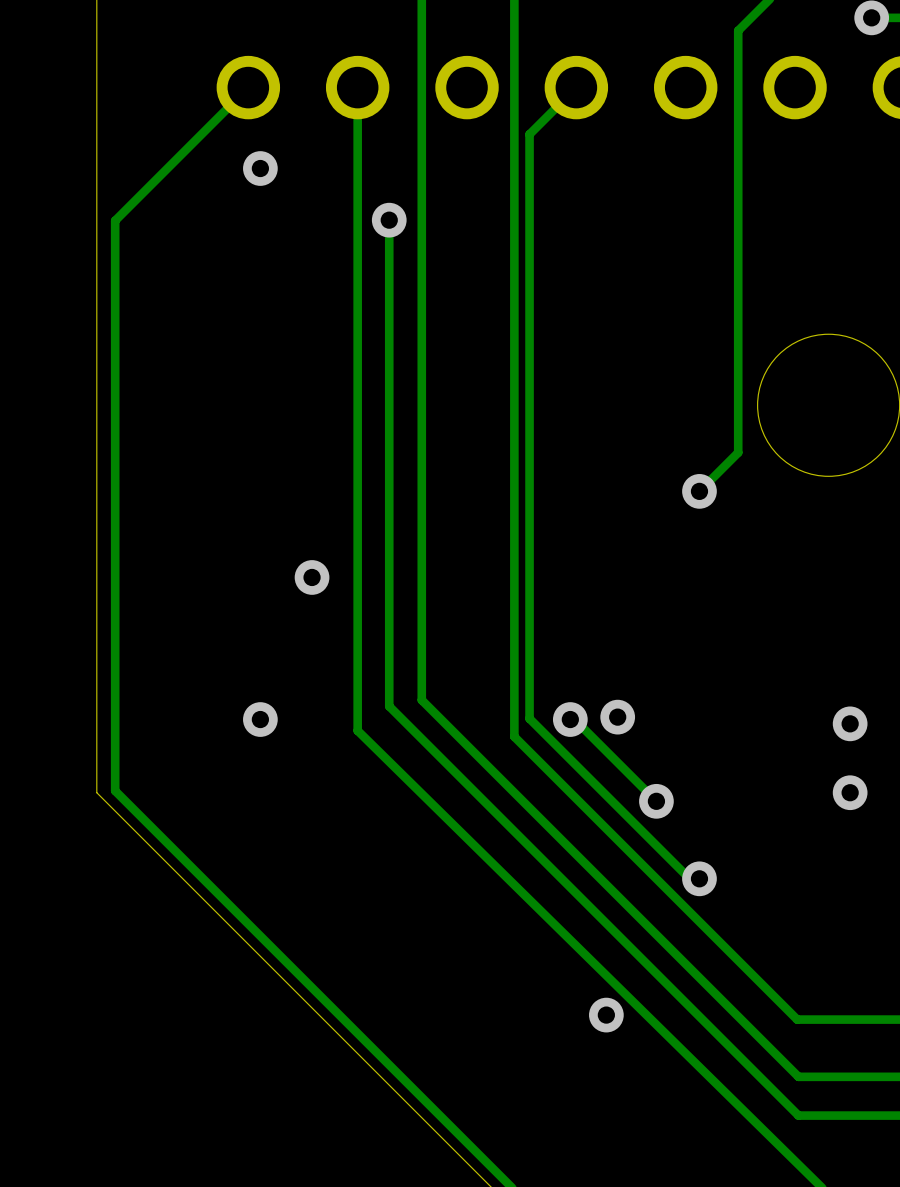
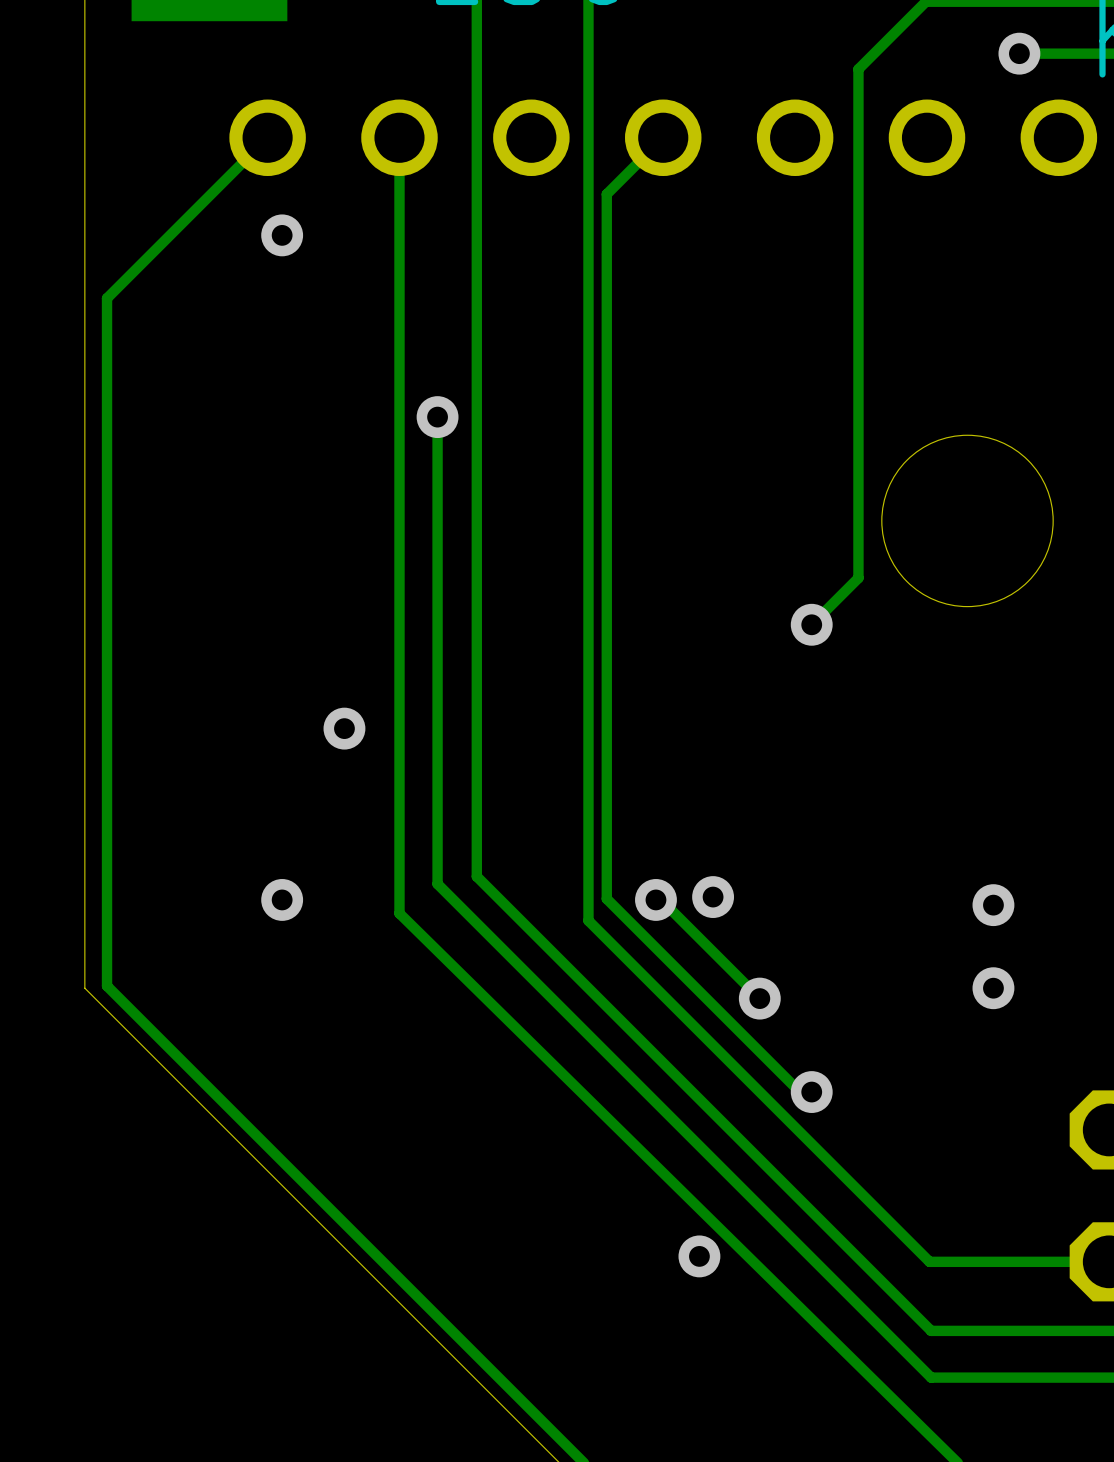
track: (389, 220) (389, 319) -> none
via position: (389, 220) -> (437, 417)

